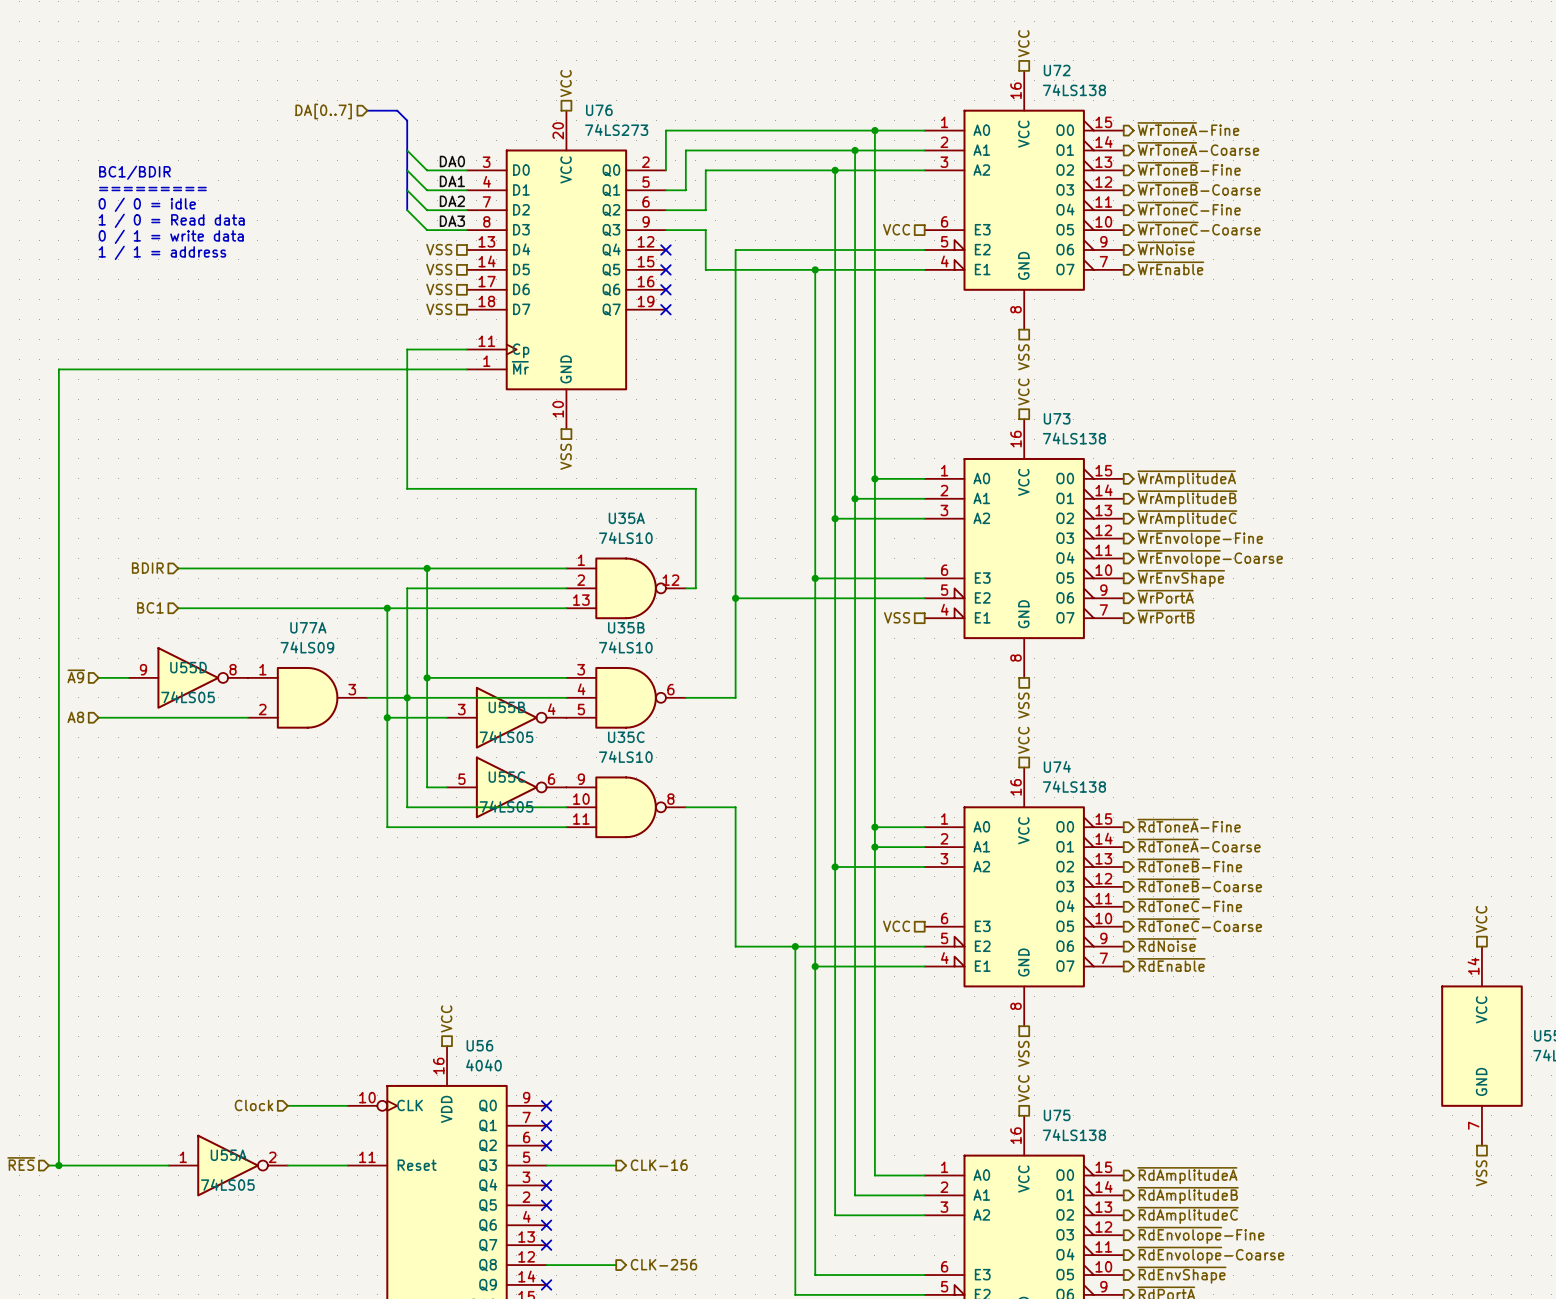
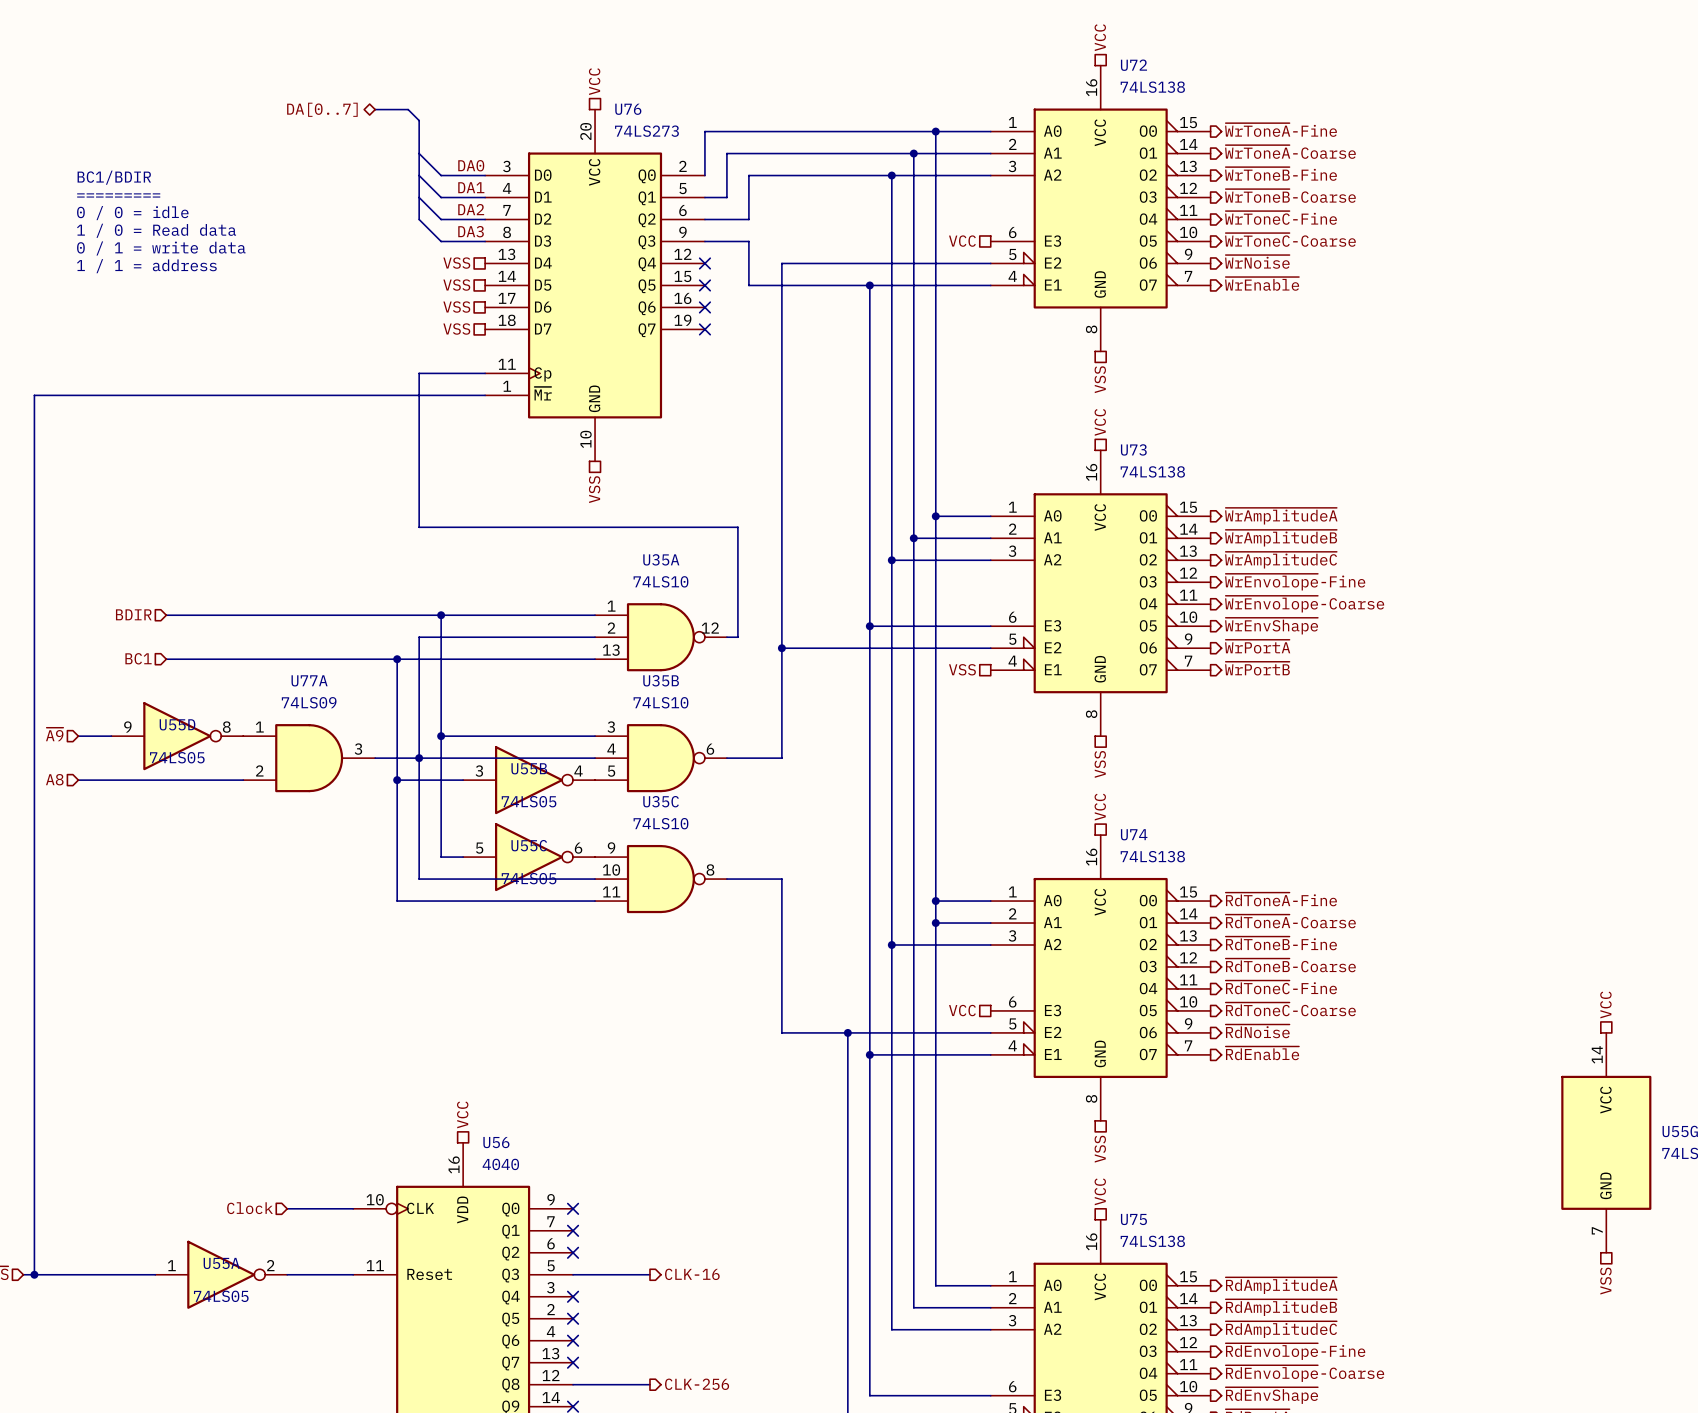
hierarchical label shape: input (323, 111) -> bidirectional (322, 109)

